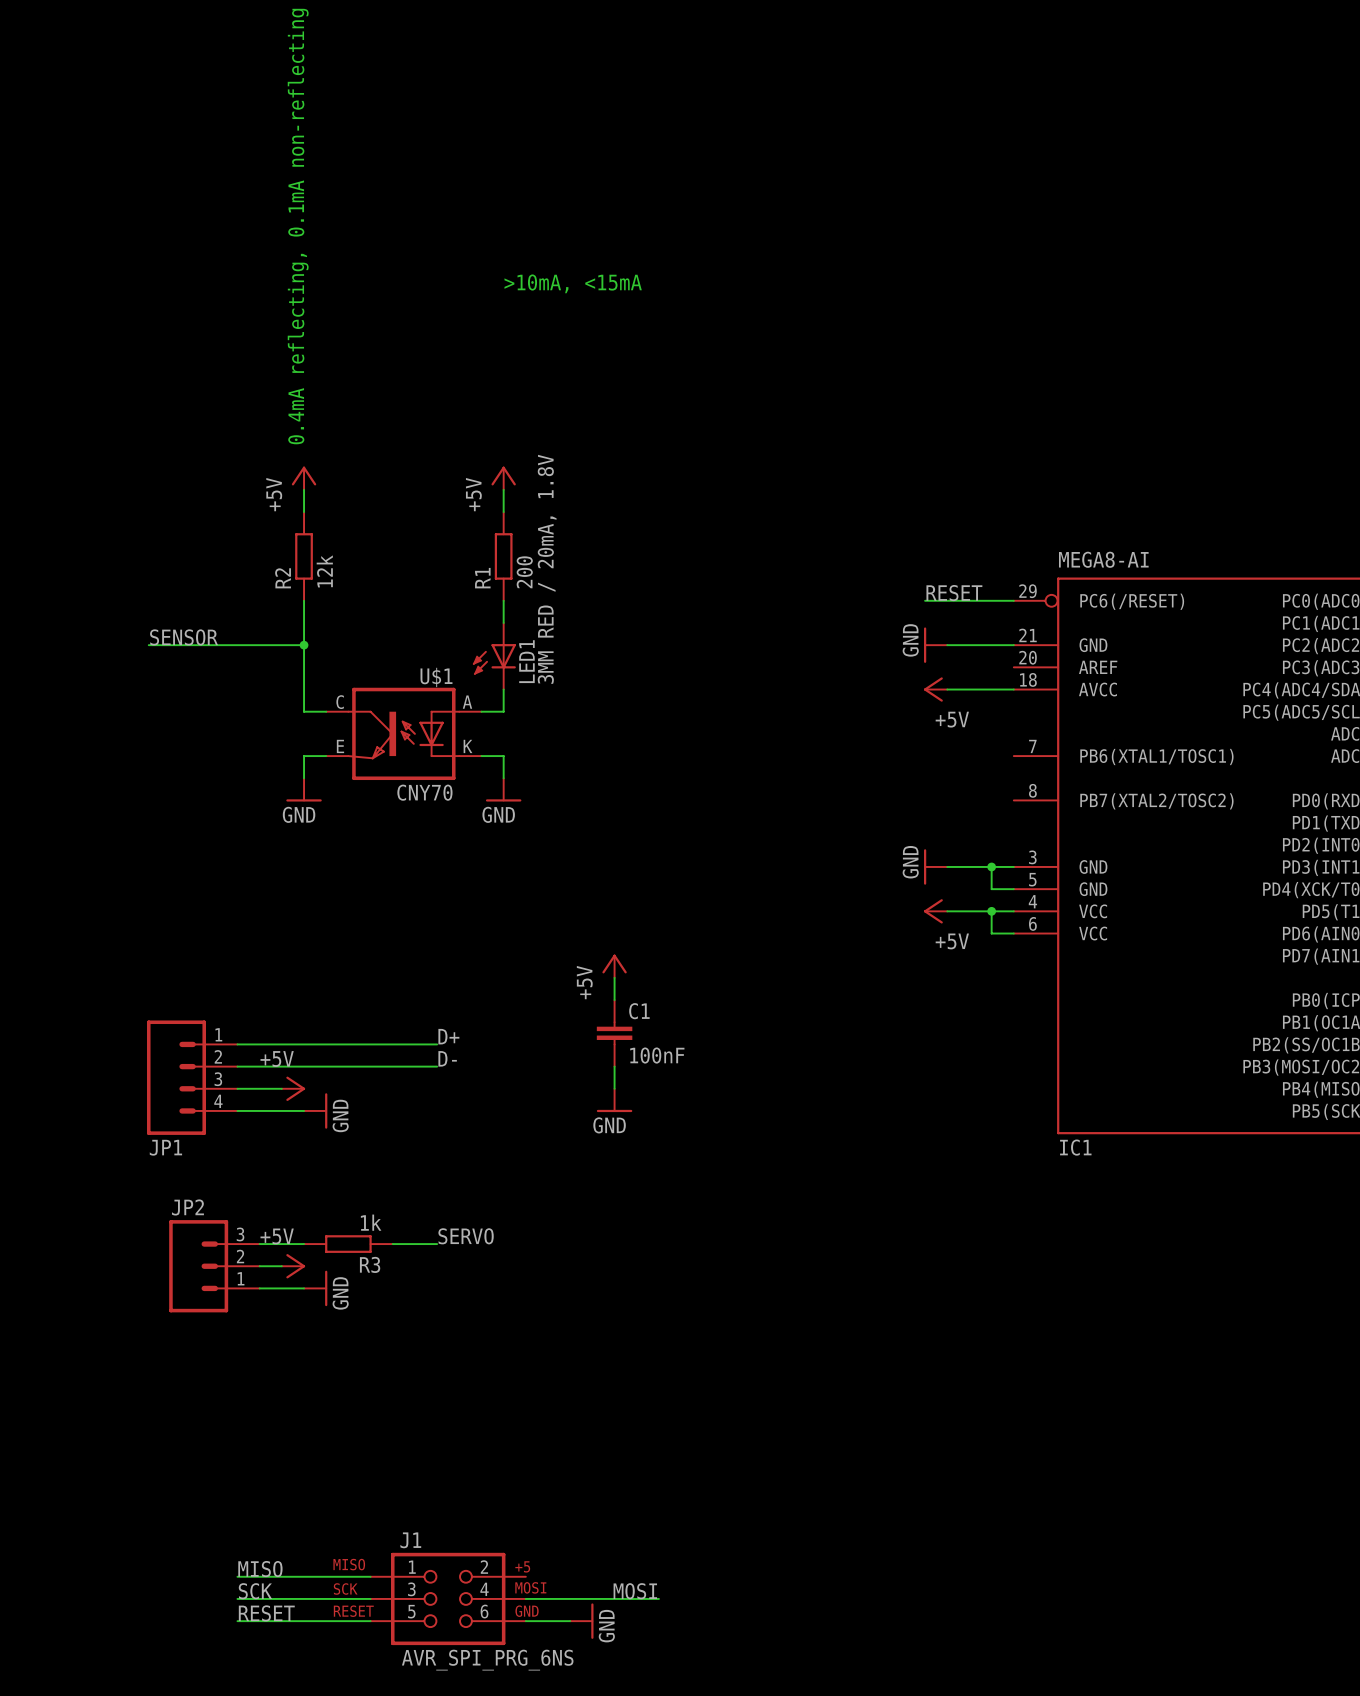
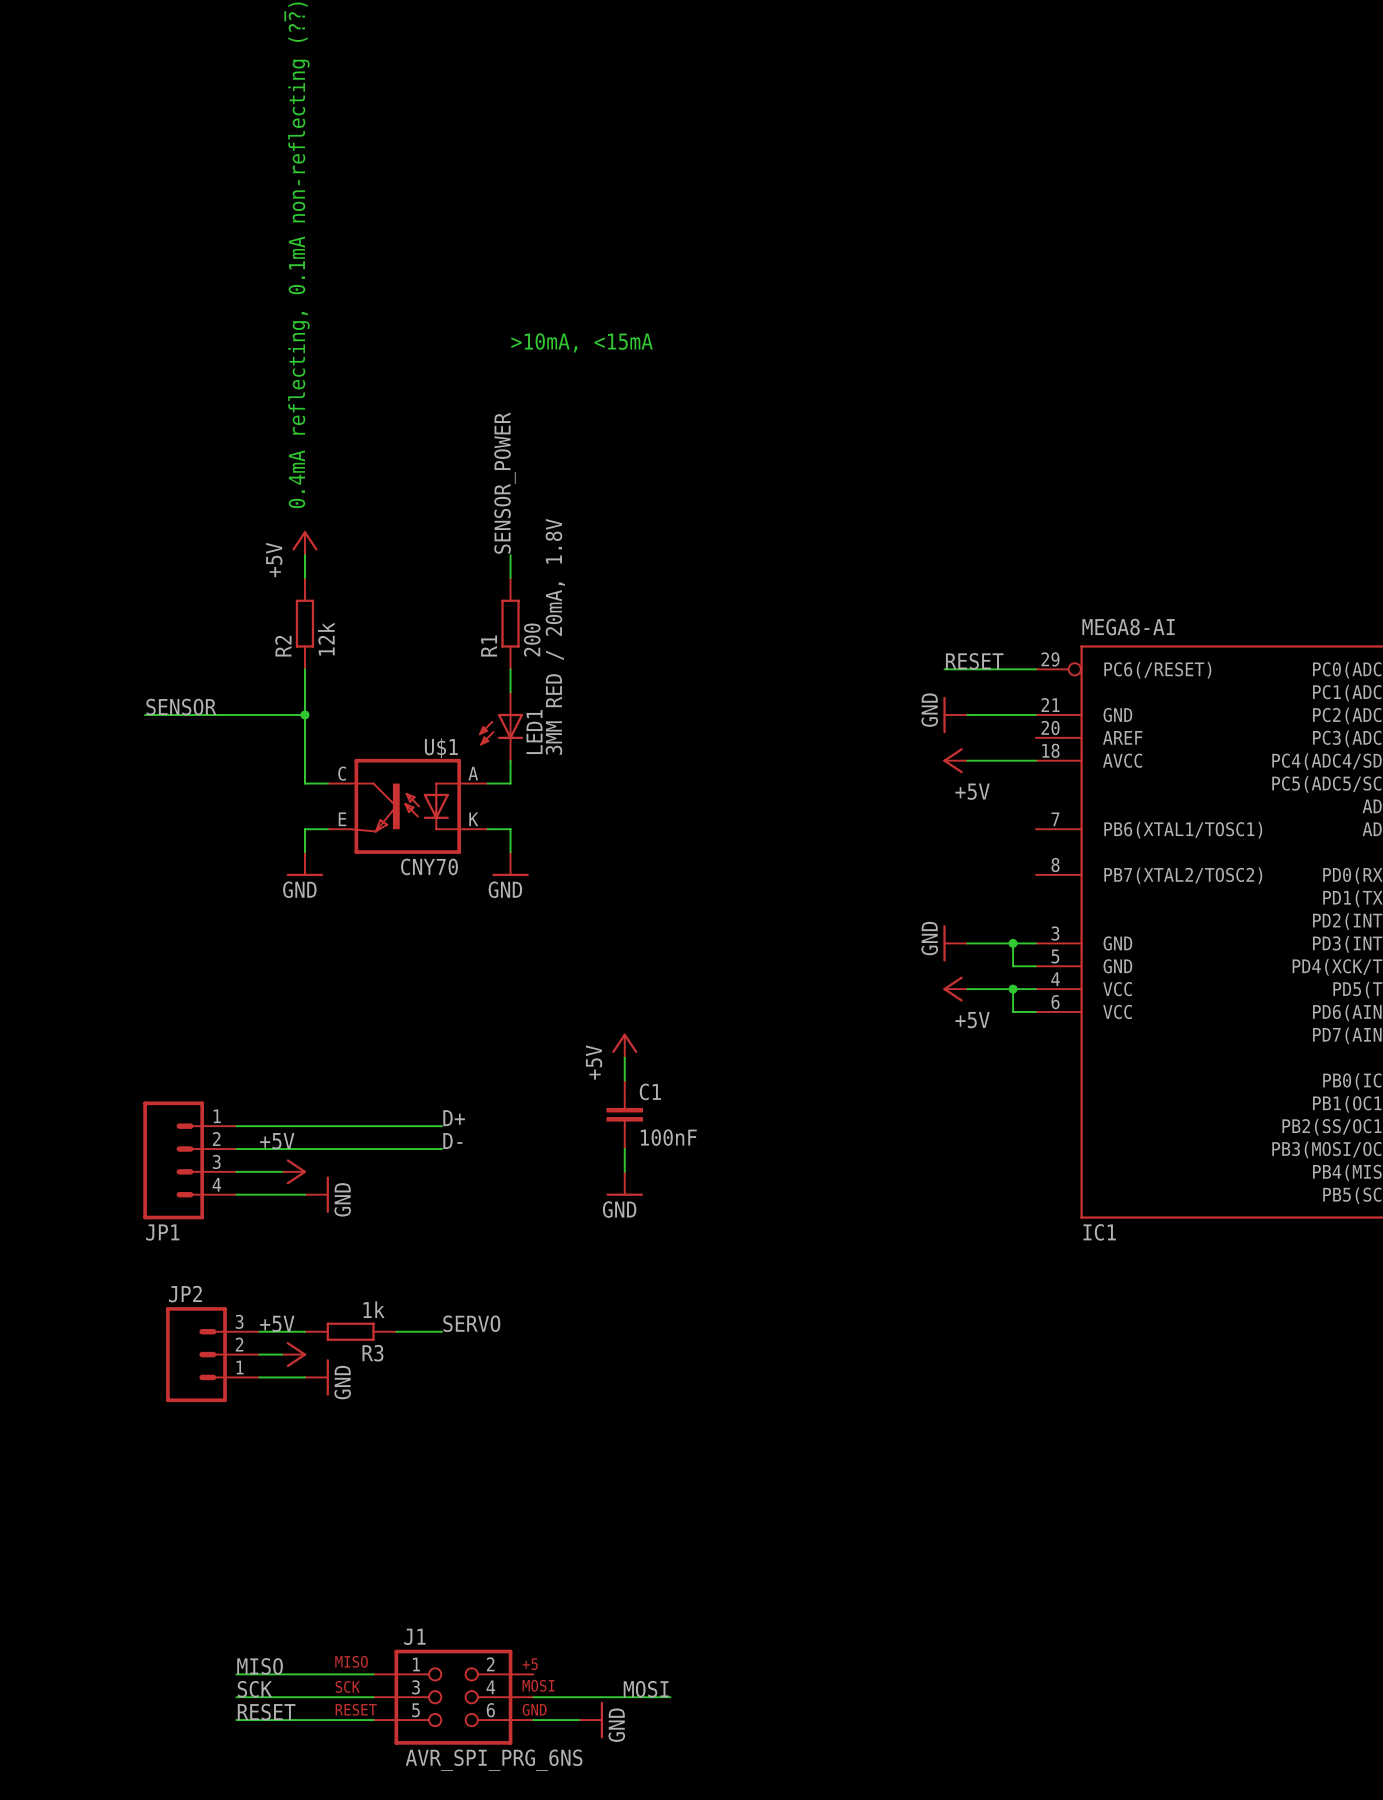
label: none -> SENSOR_POWER (504, 483)
power symbol: +5V (503, 478) -> none

